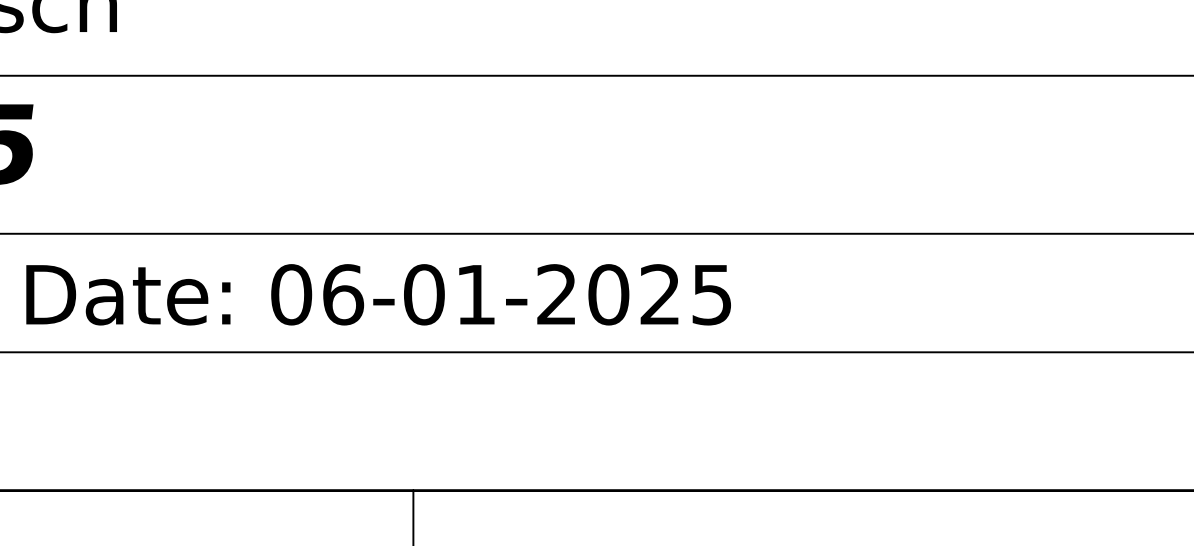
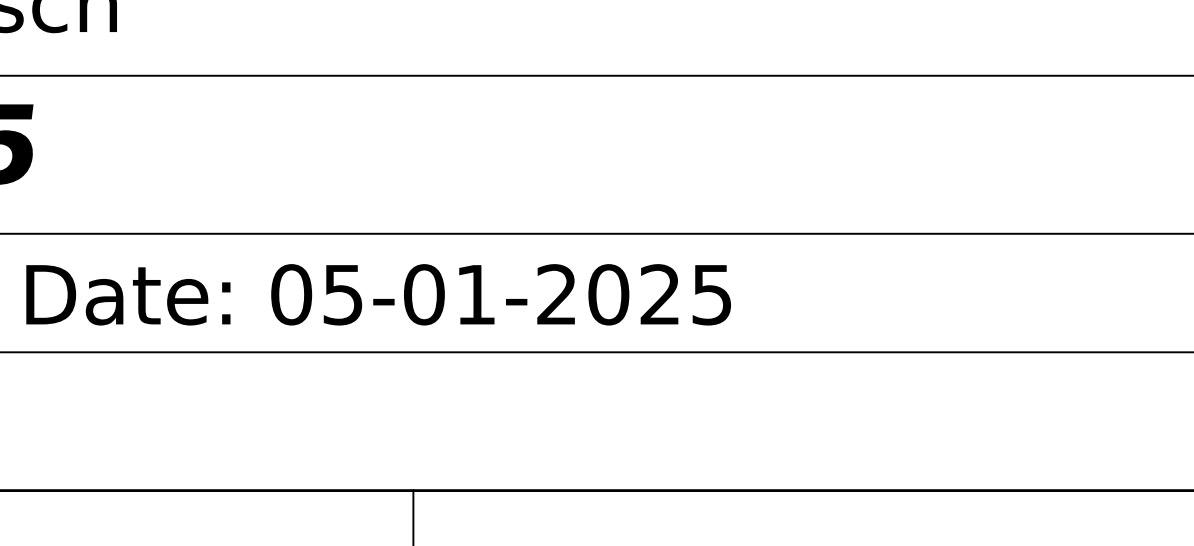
title block: Date: 06-01-2025 (378, 294) -> Date: 05-01-2025 (378, 294)

